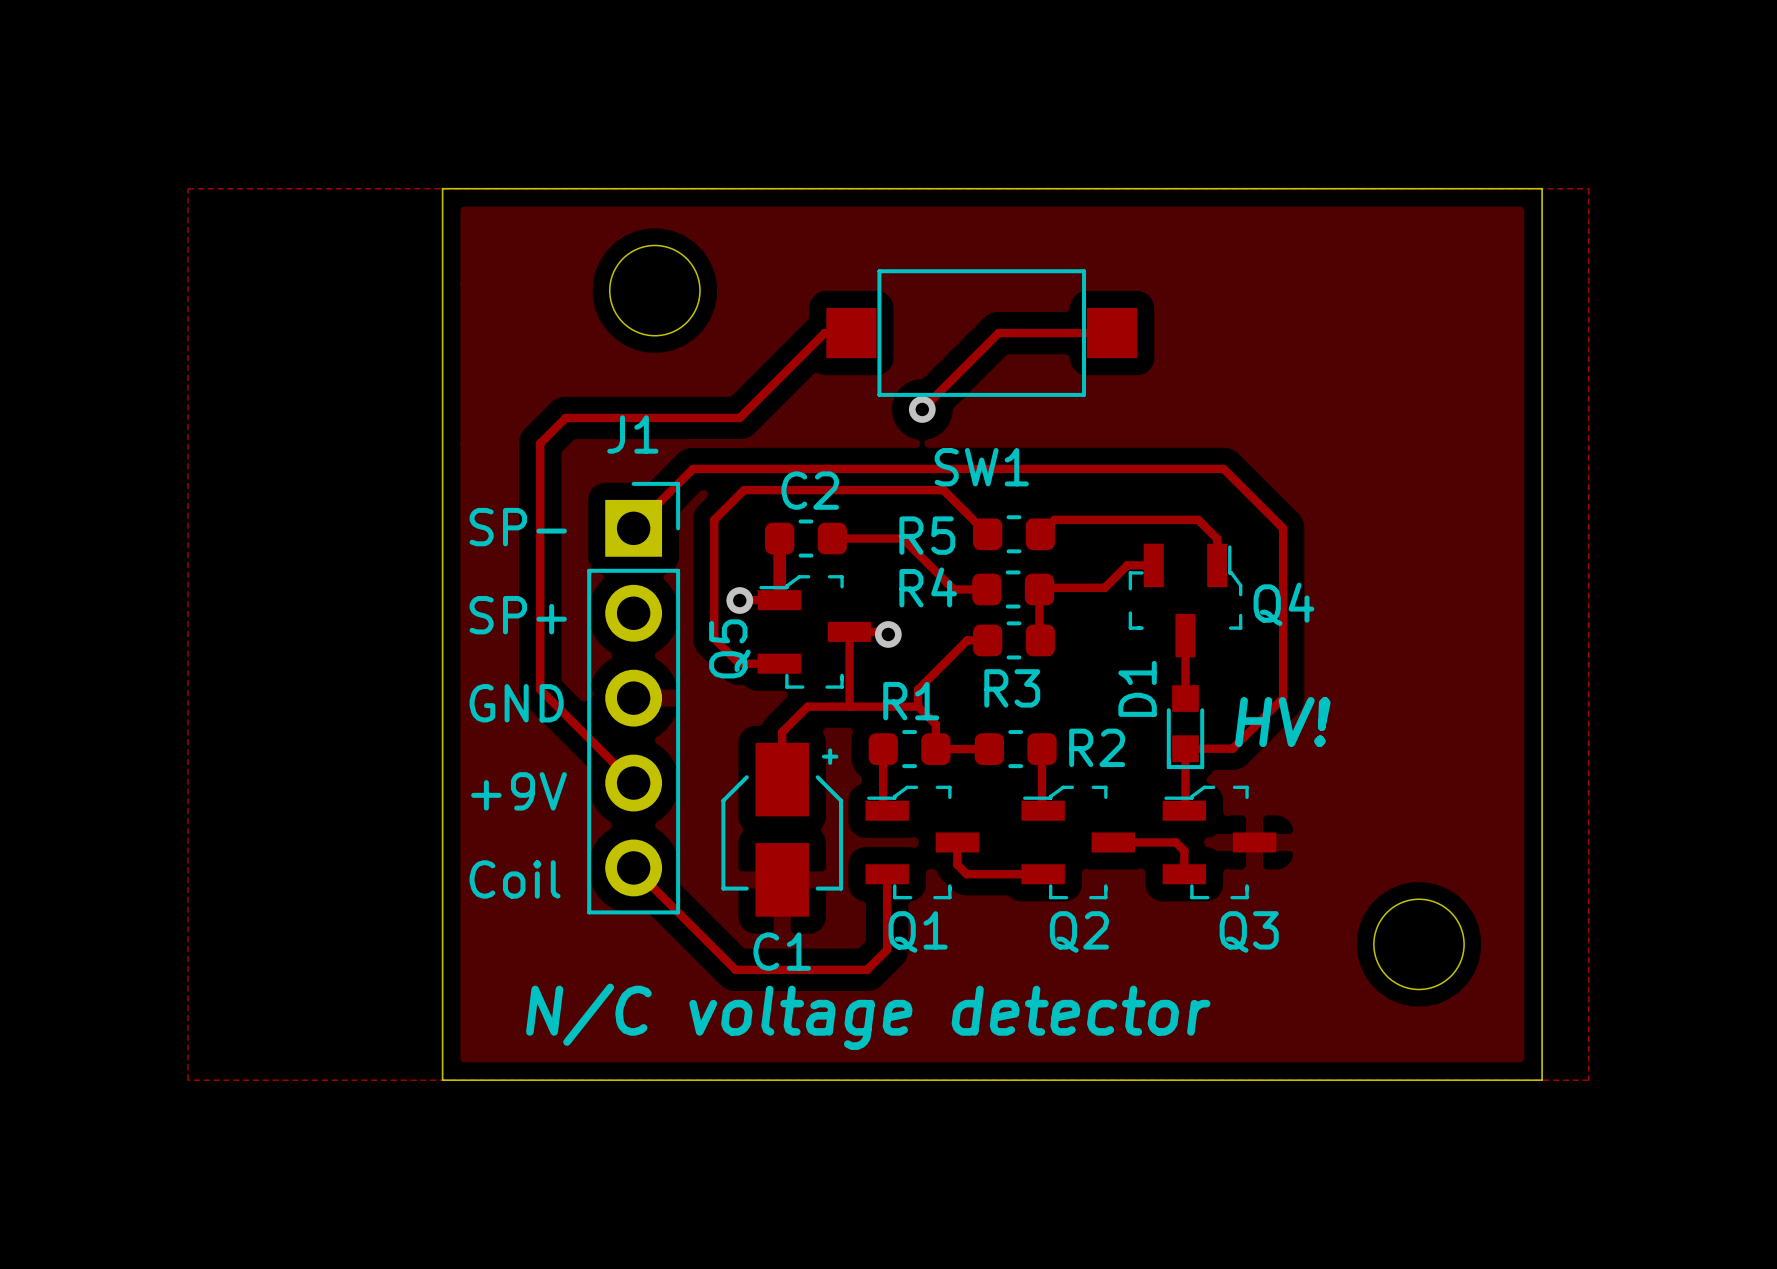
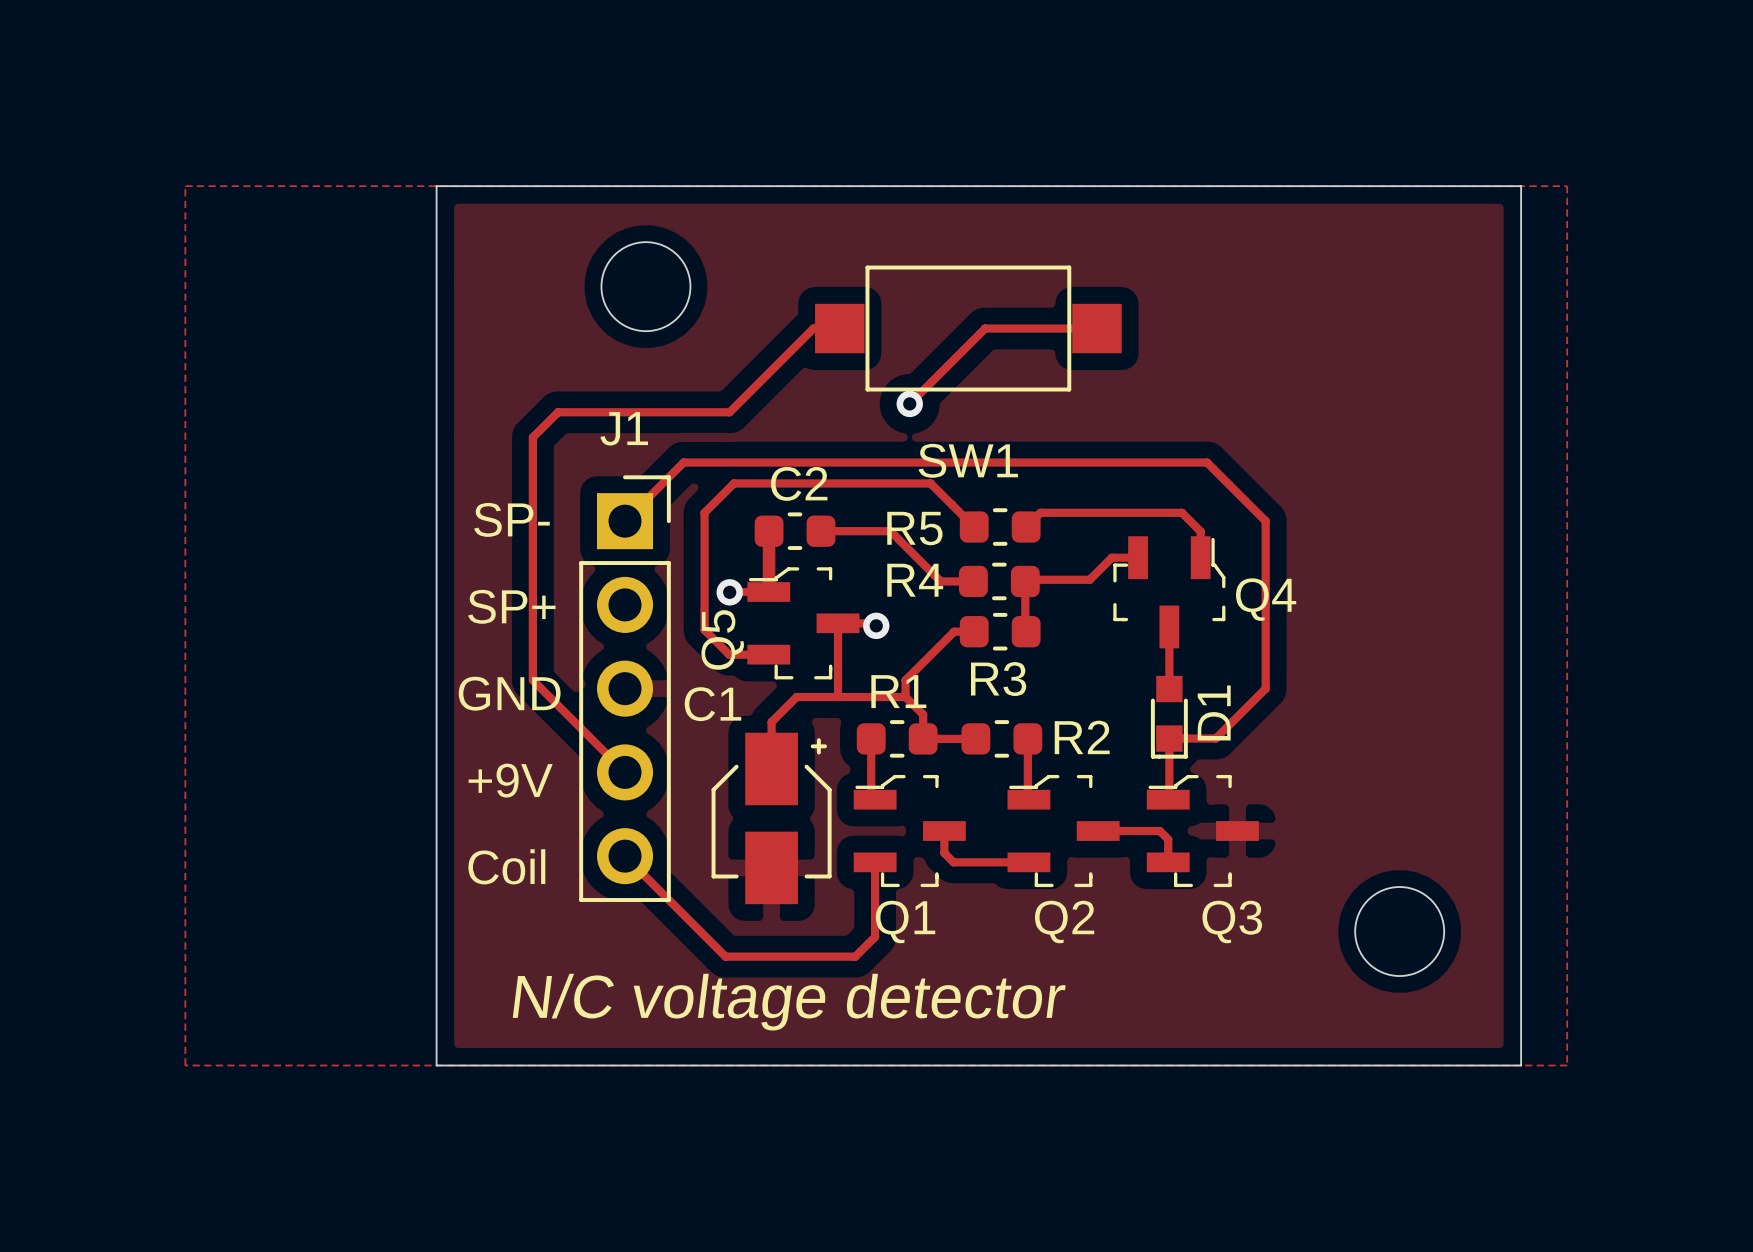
D1 name position: D1 (1137, 688) -> D1 (1214, 712)
text: HV! (1282, 722) -> none
C1 name position: C1 (782, 951) -> C1 (713, 704)

